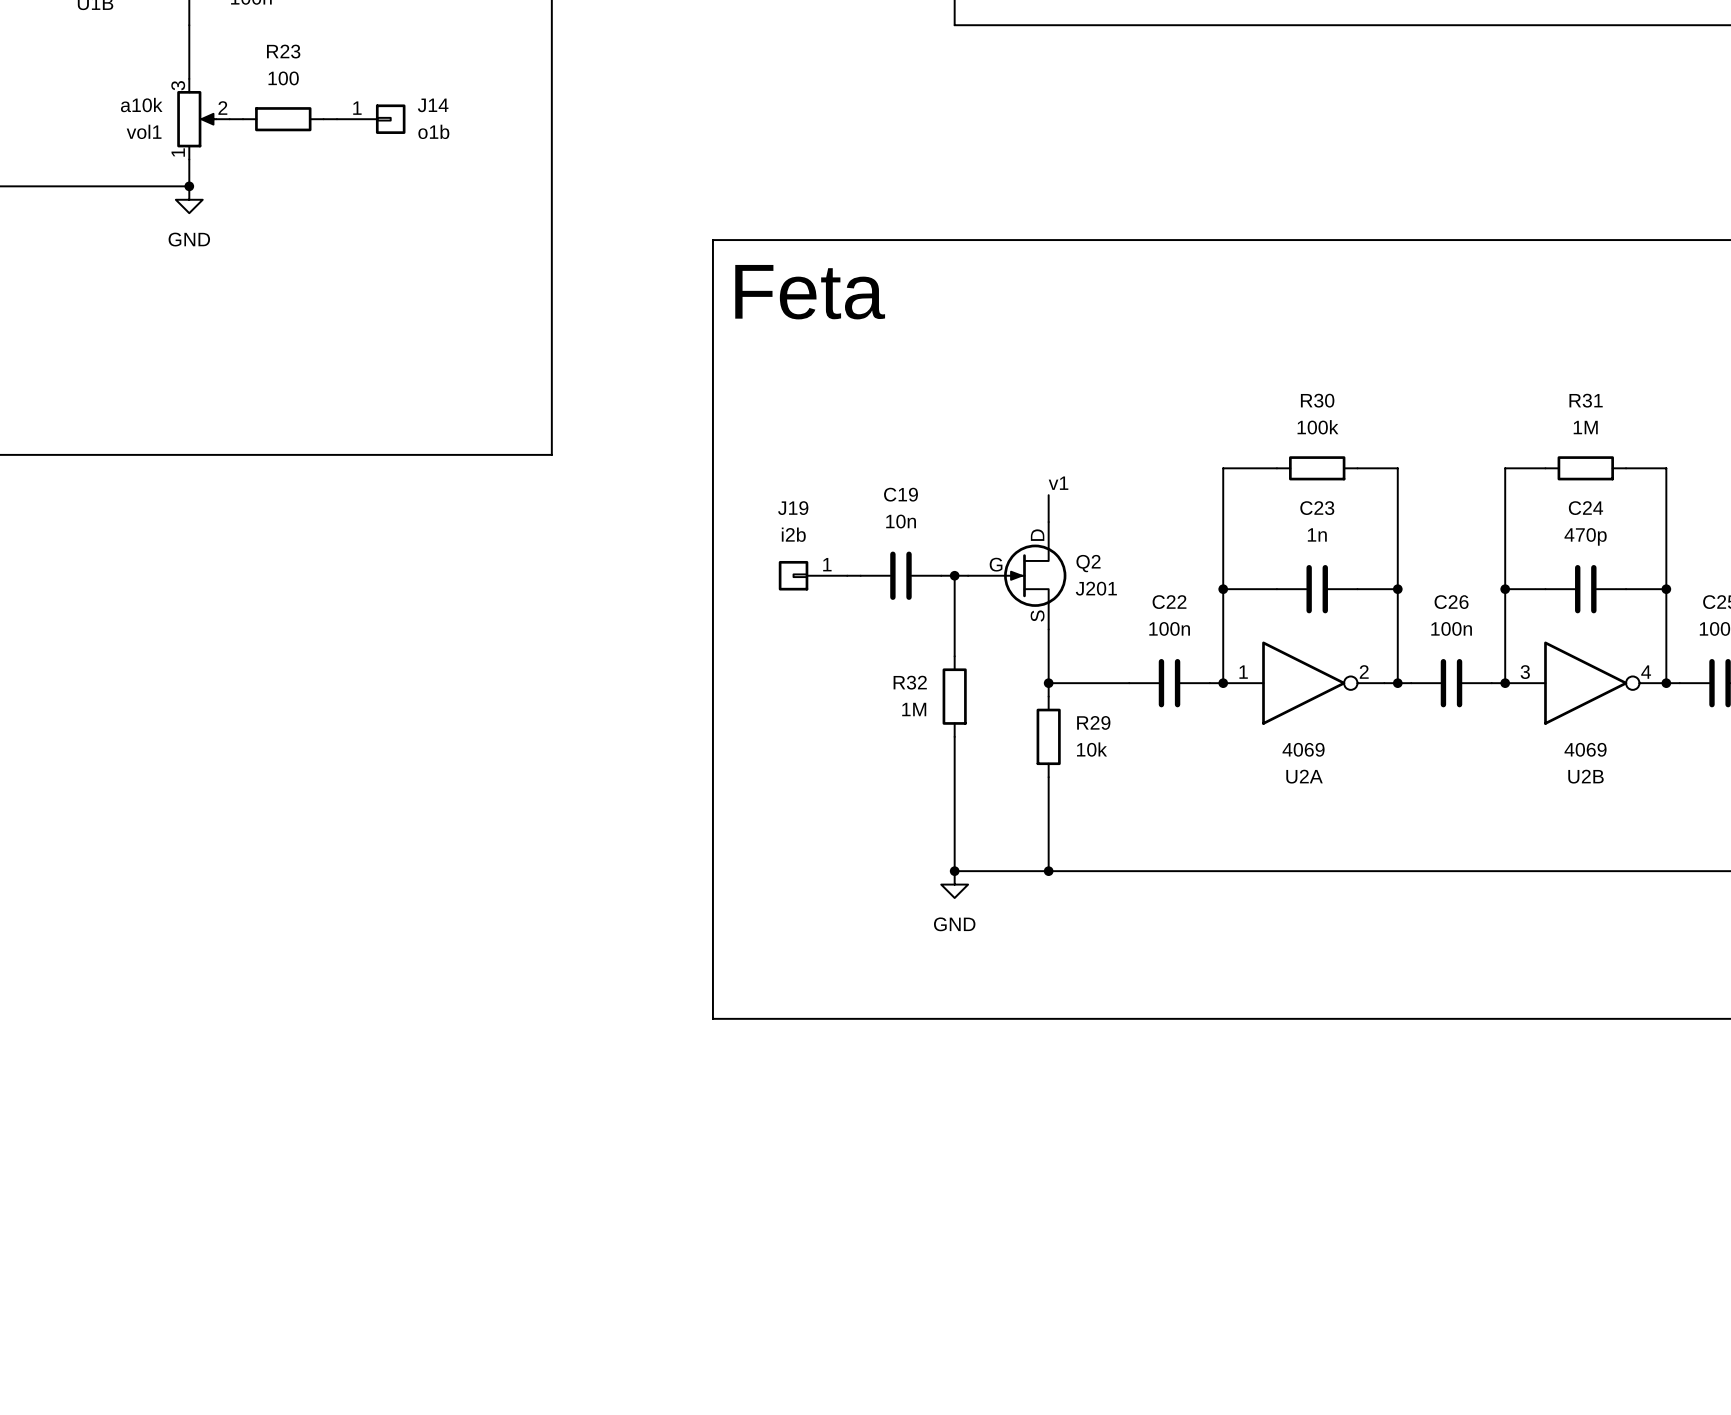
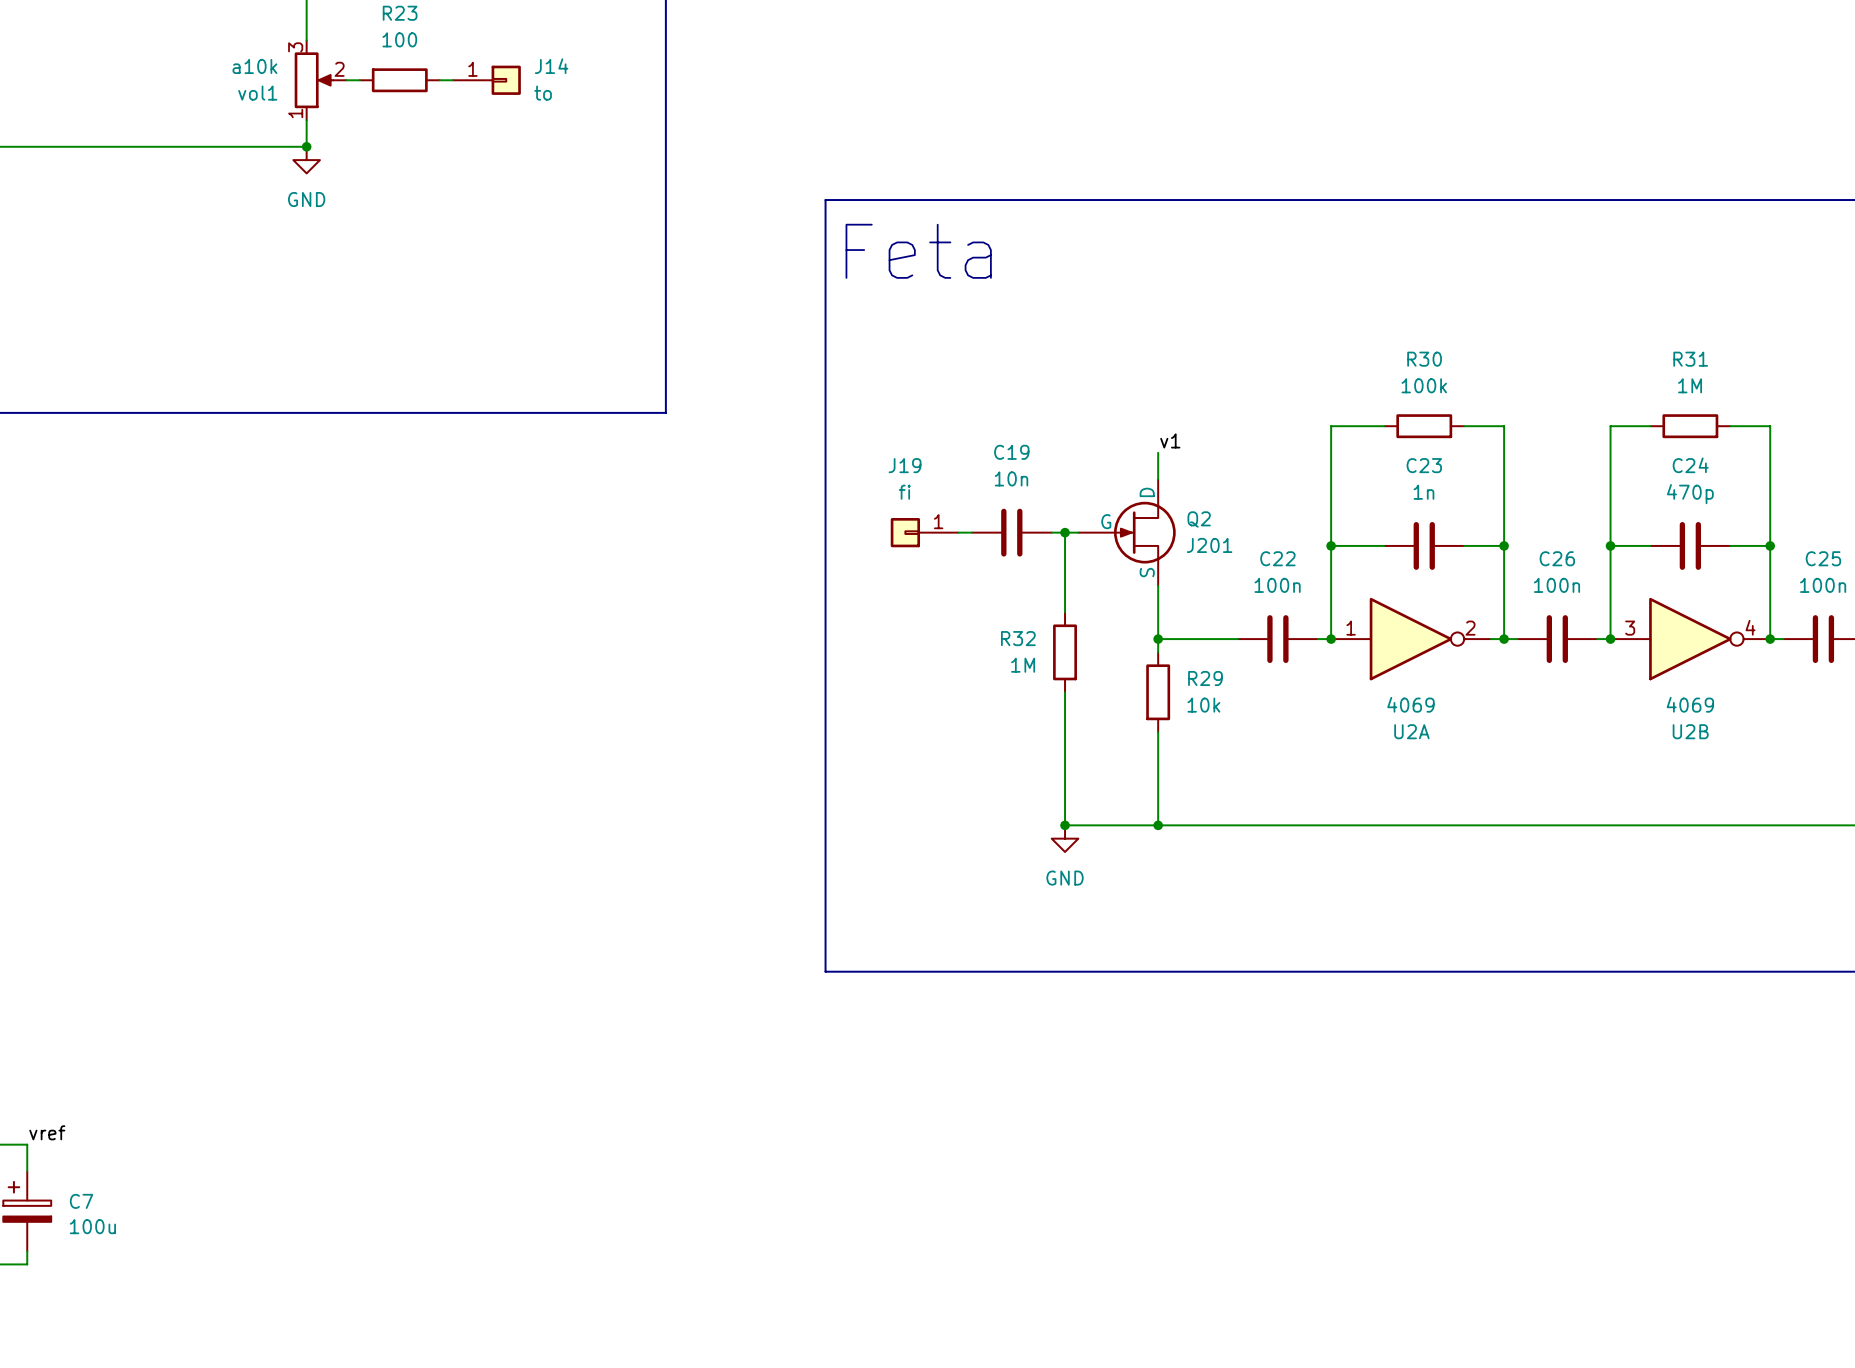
J14 value: o1b (433, 131) -> to (543, 93)
J19 value: i2b (793, 534) -> fi (904, 492)

